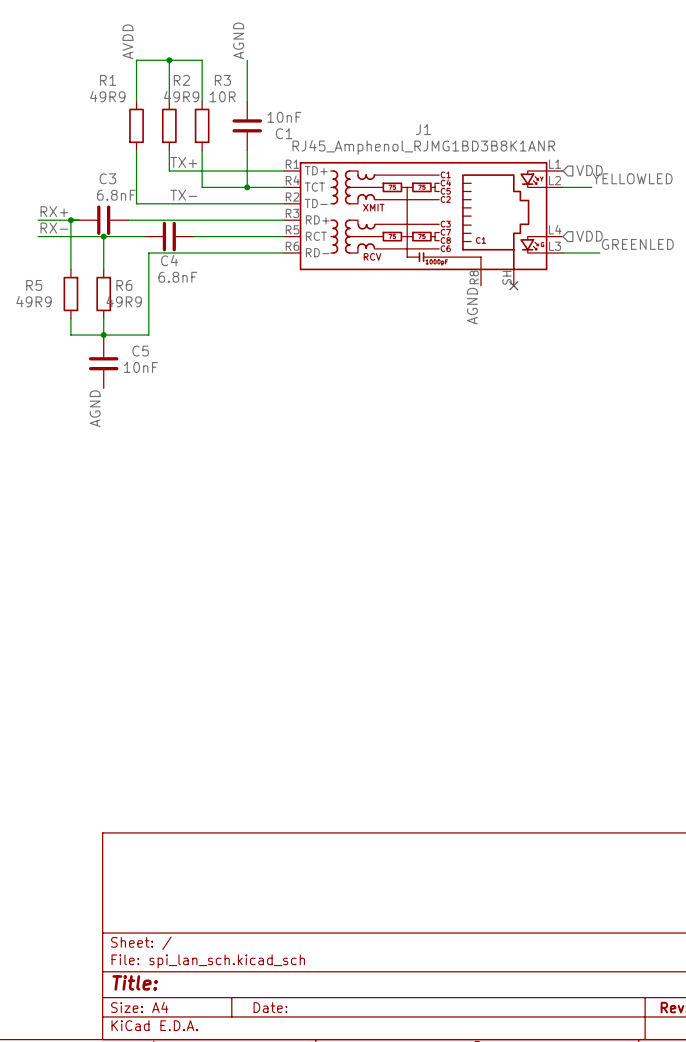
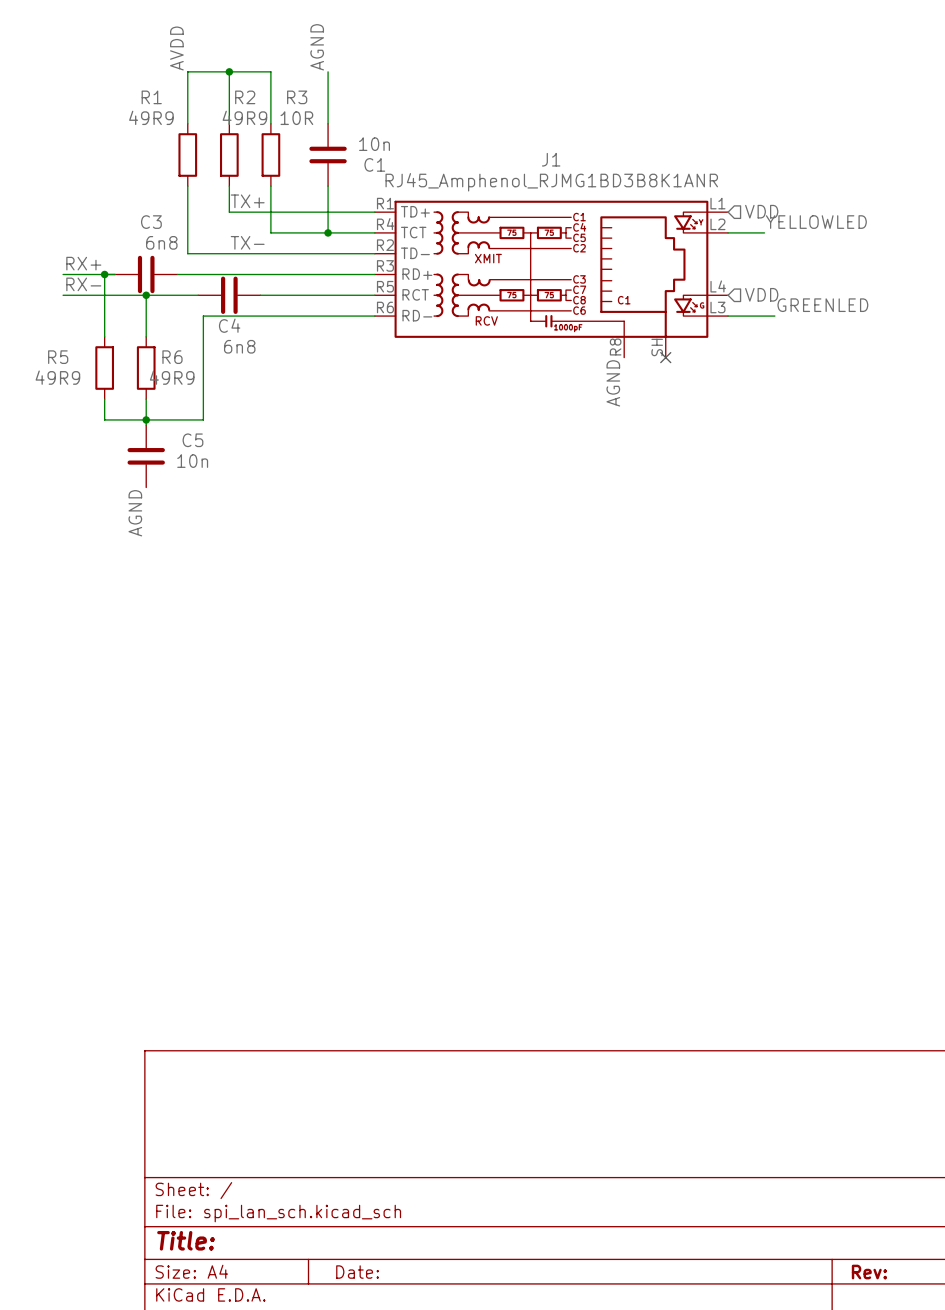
C1 value: 10nF (284, 117) -> 10n (374, 144)
C3 value: 6.8nF (116, 195) -> 6n8 (161, 242)
C4 value: 6.8nF (177, 277) -> 6n8 (239, 346)
C5 value: 10nF (140, 367) -> 10n (192, 461)

